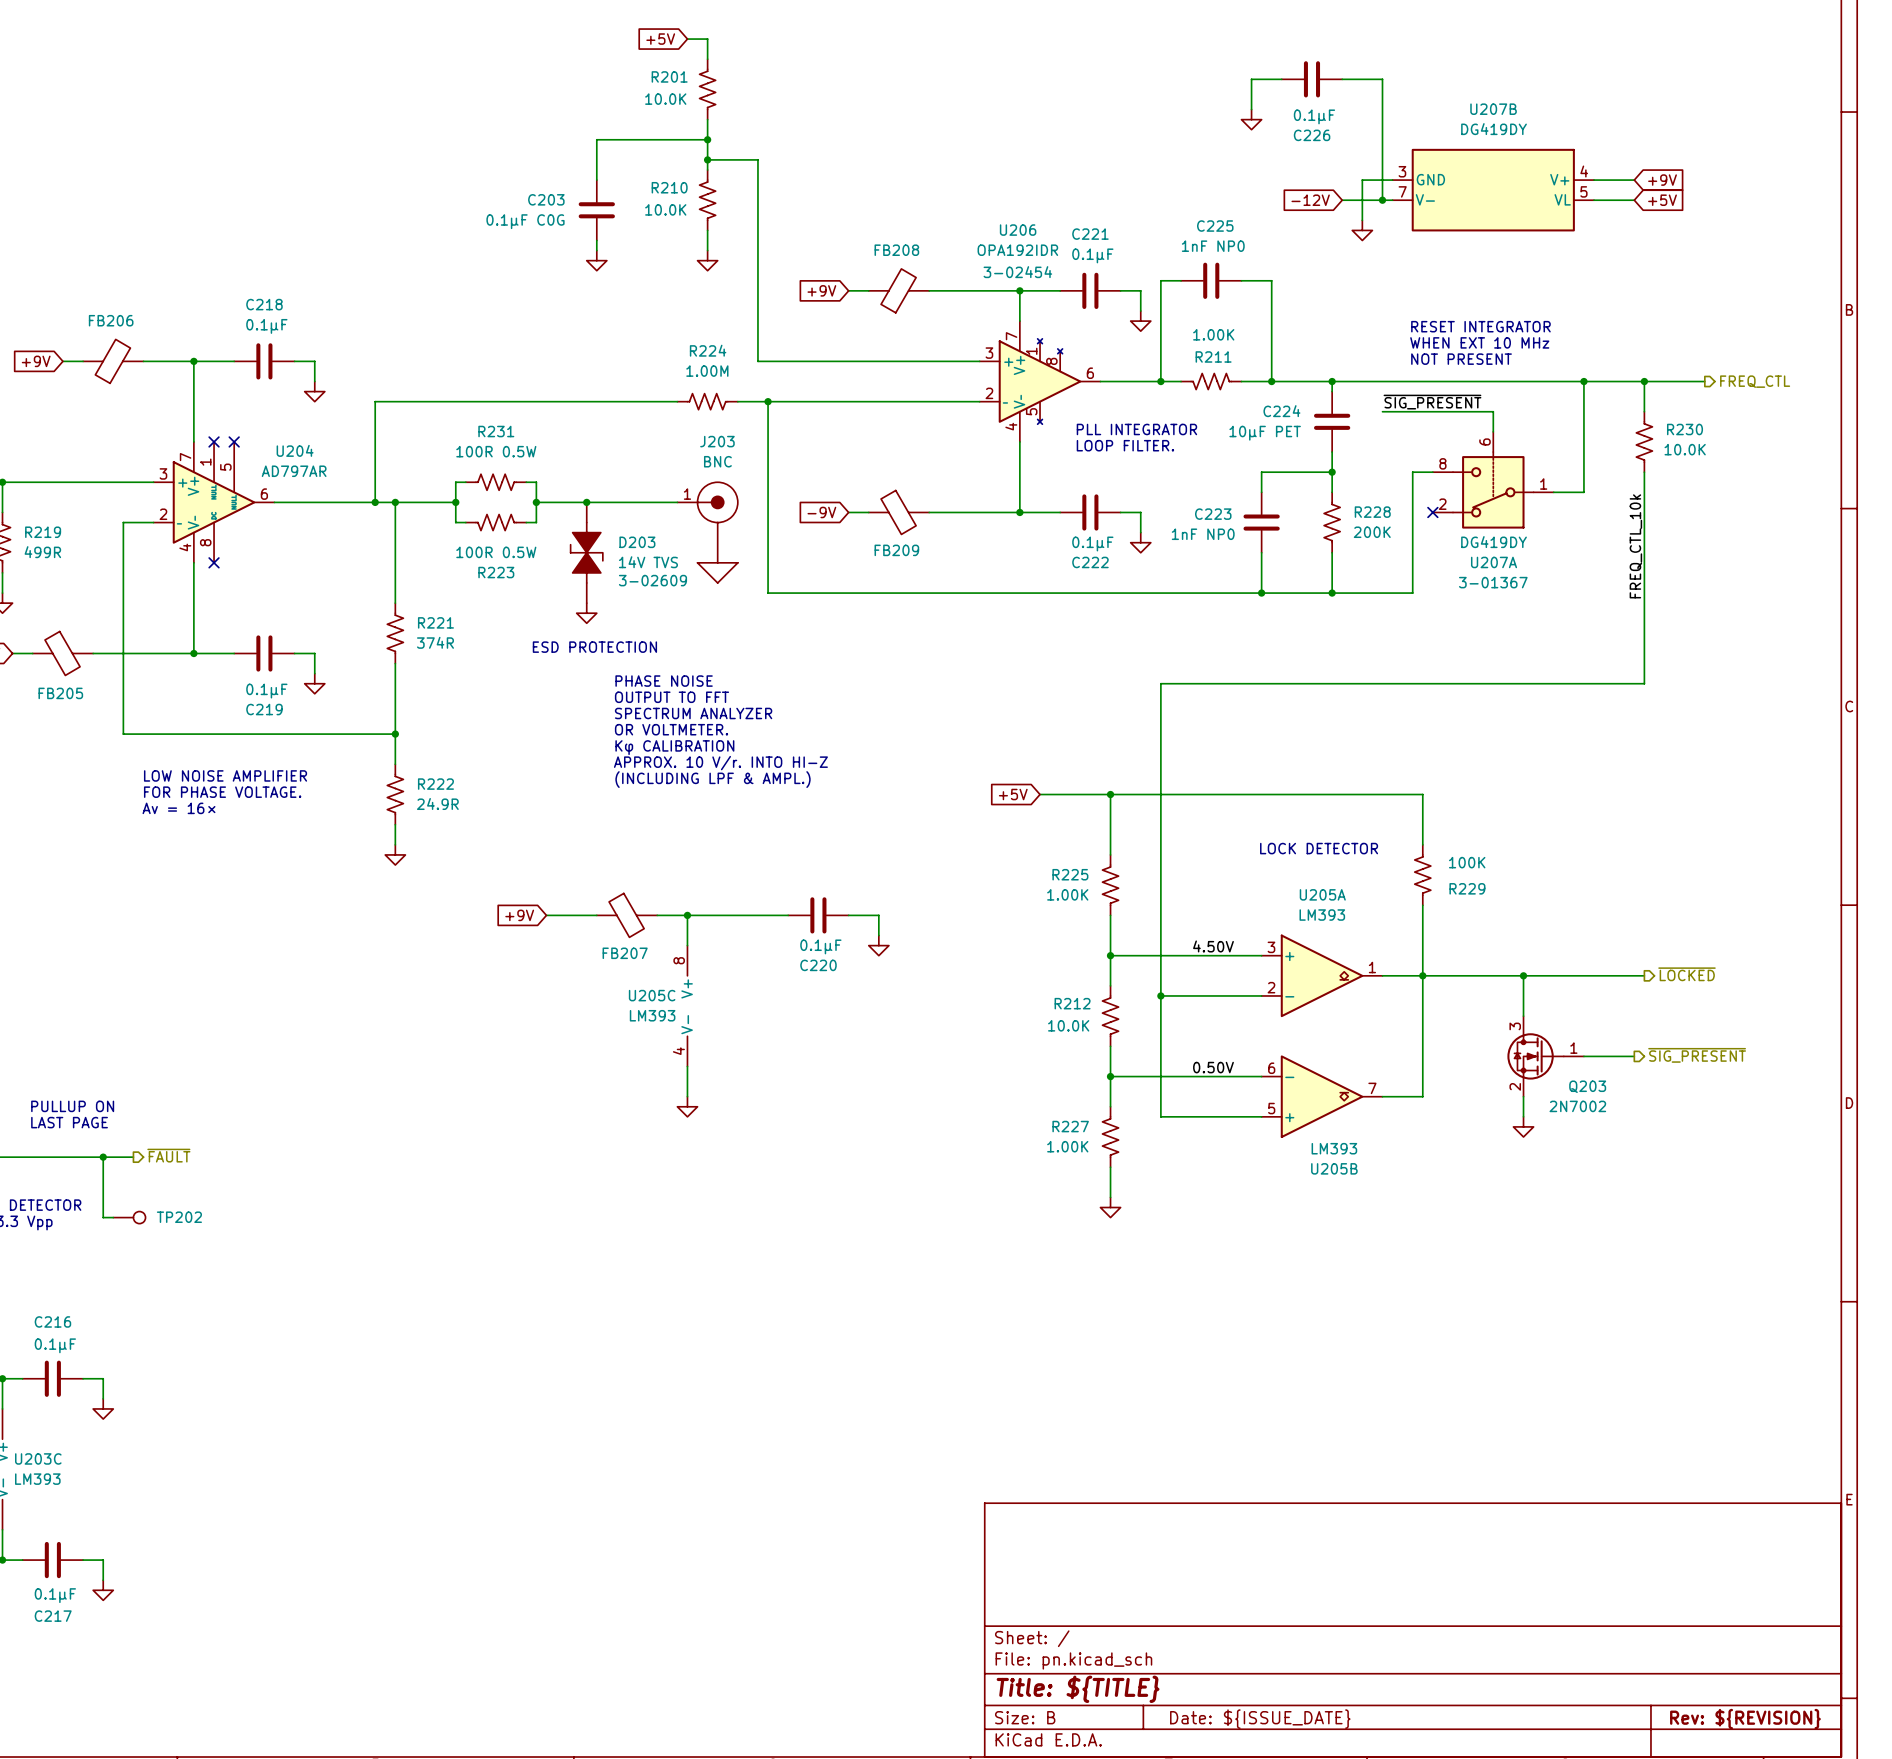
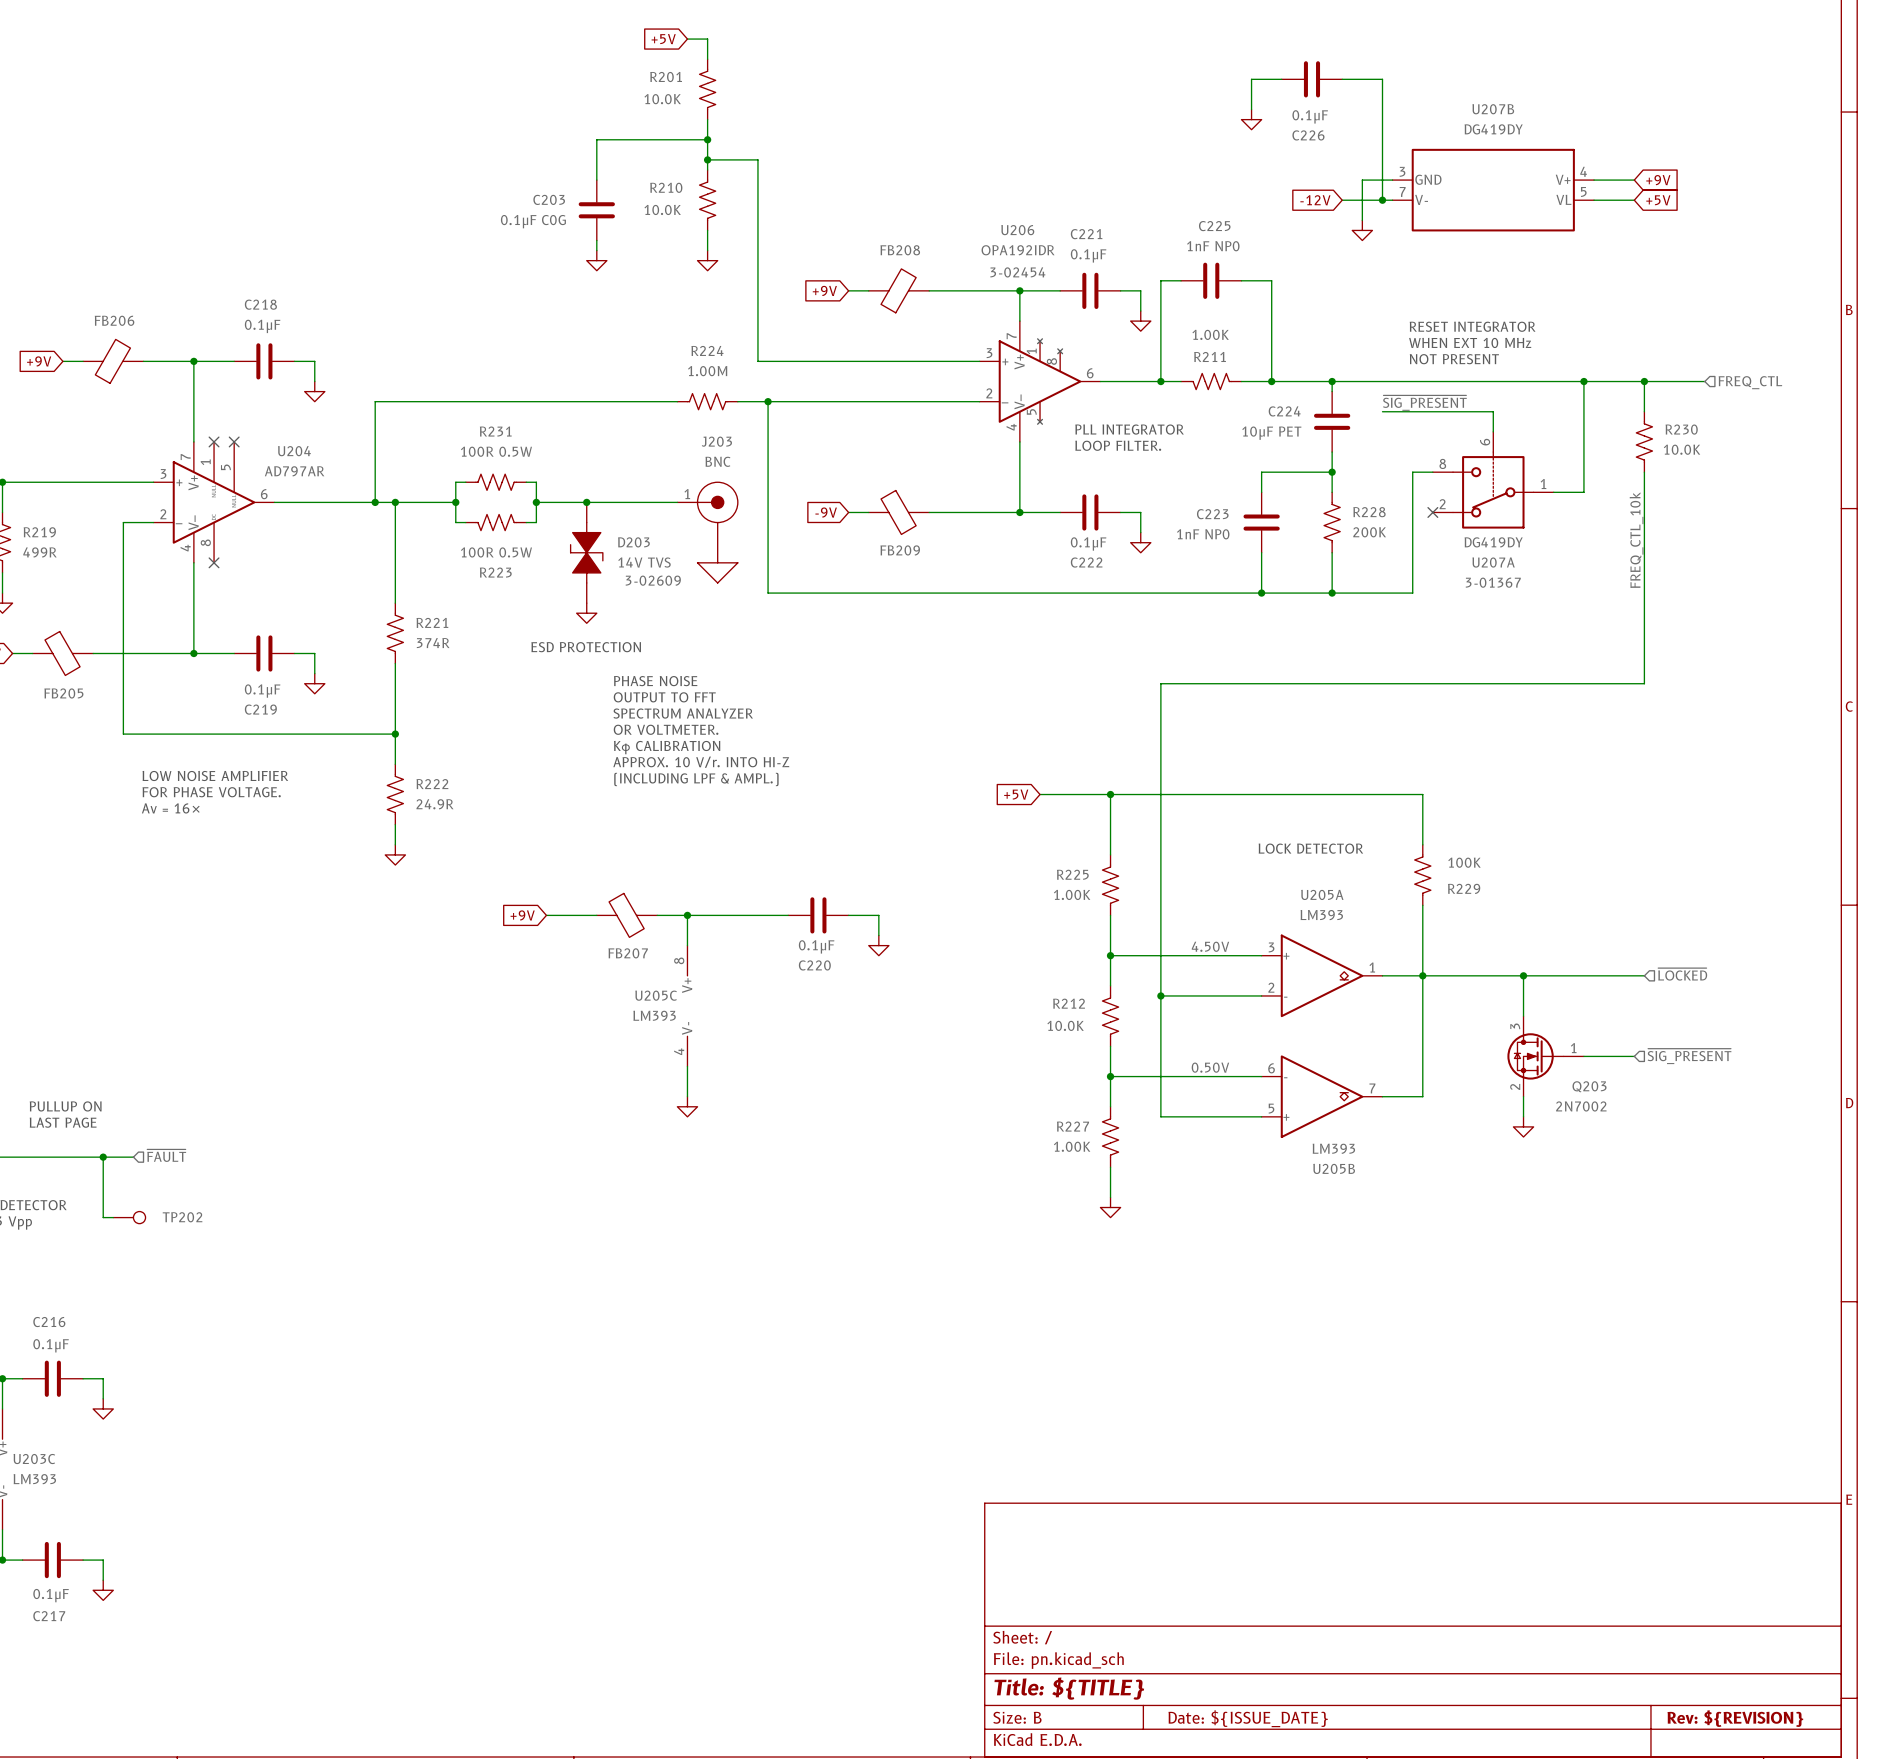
hierarchical label shape: output (1755, 381) -> input (1750, 382)
hierarchical label shape: output (1687, 974) -> input (1682, 974)
hierarchical label shape: output (1697, 1055) -> input (1689, 1056)
hierarchical label shape: output (168, 1155) -> input (166, 1155)

